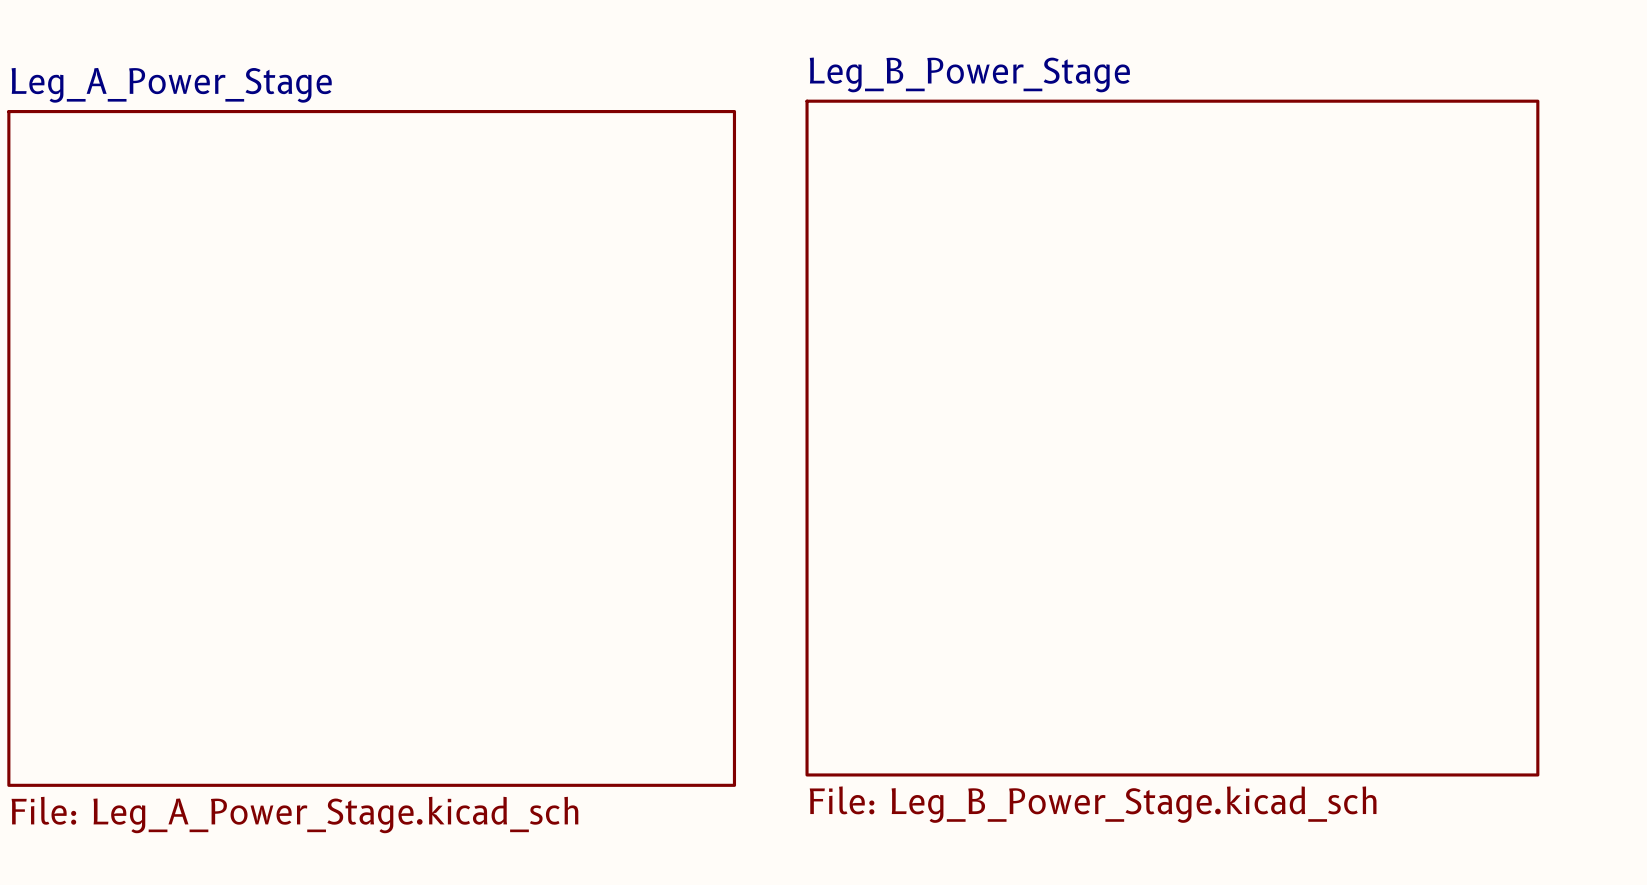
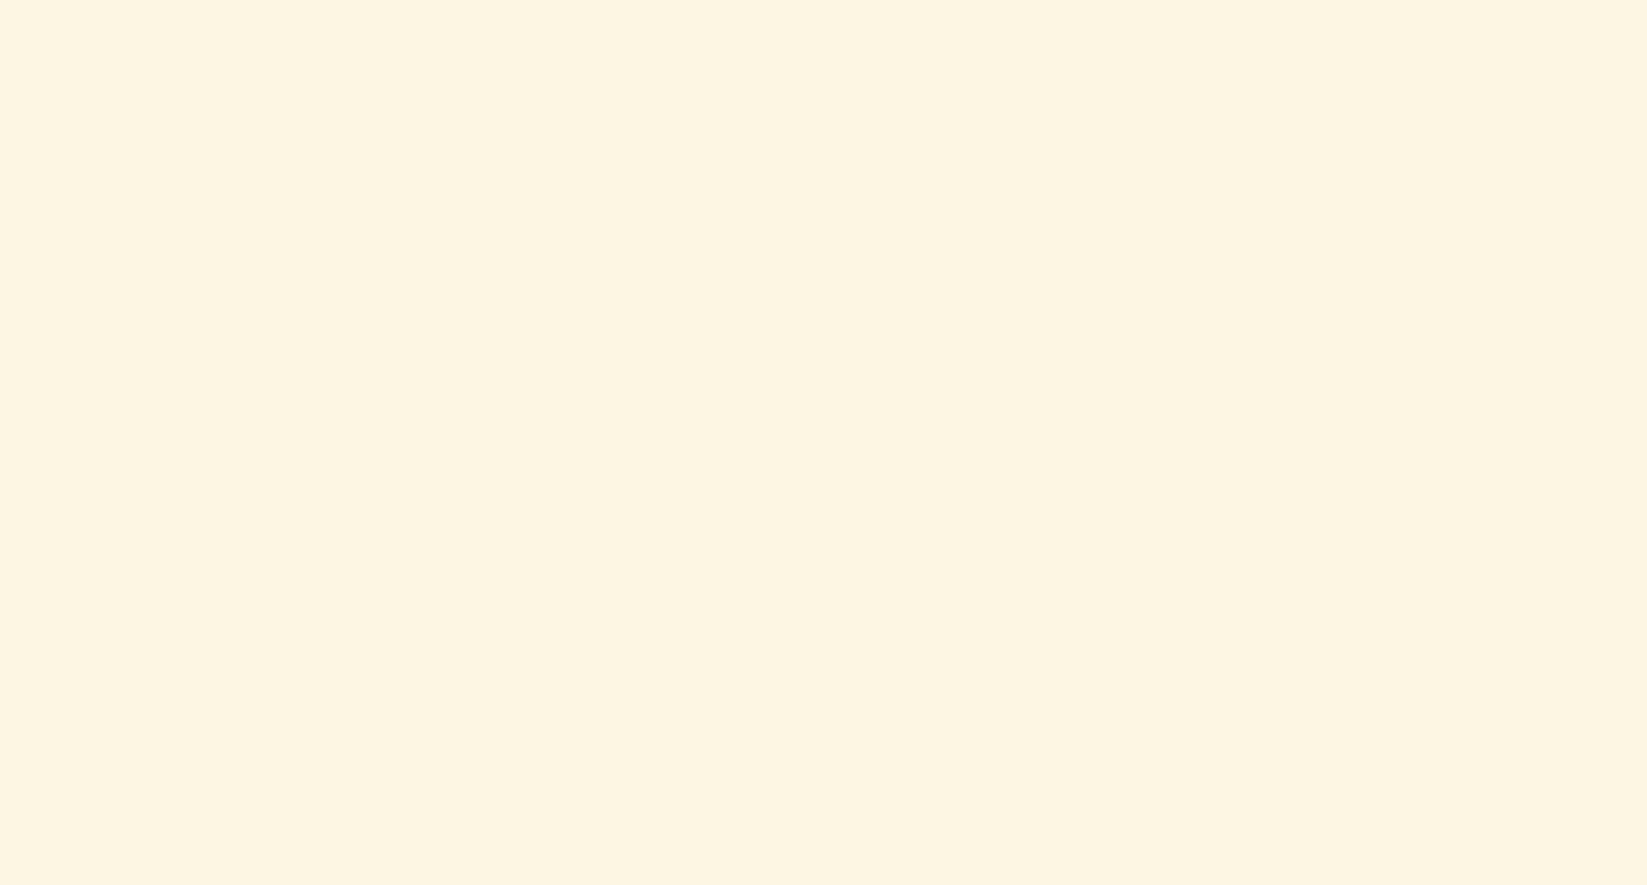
sheet Leg_B_Power_Stage: File: Leg_B_Power_Stage.kicad_sch (1172, 438) -> none
sheet Leg_A_Power_Stage: File: Leg_A_Power_Stage.kicad_sch (371, 448) -> none

